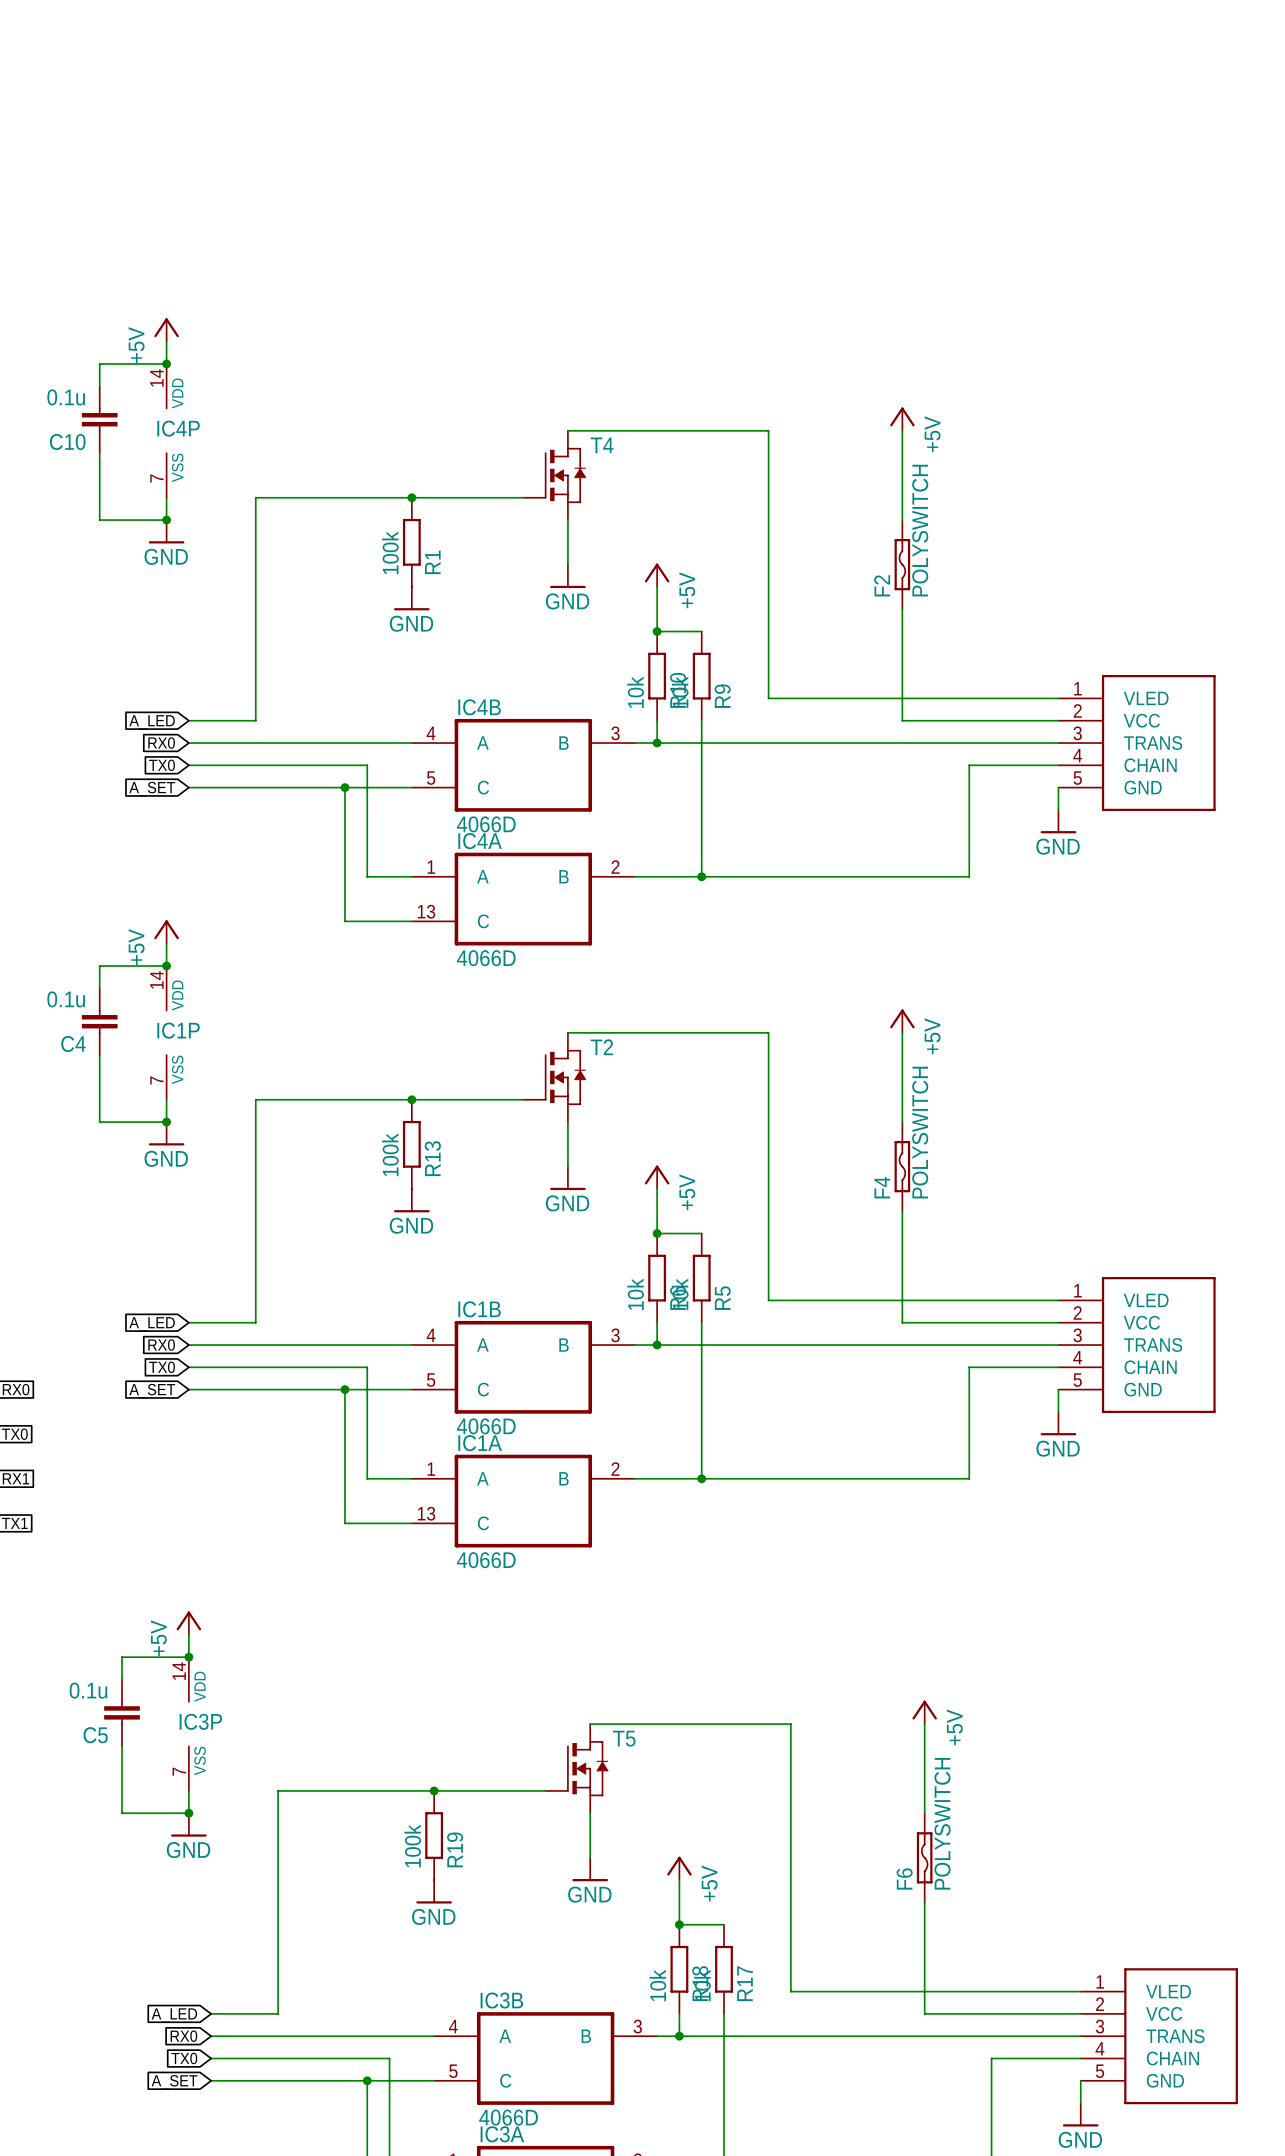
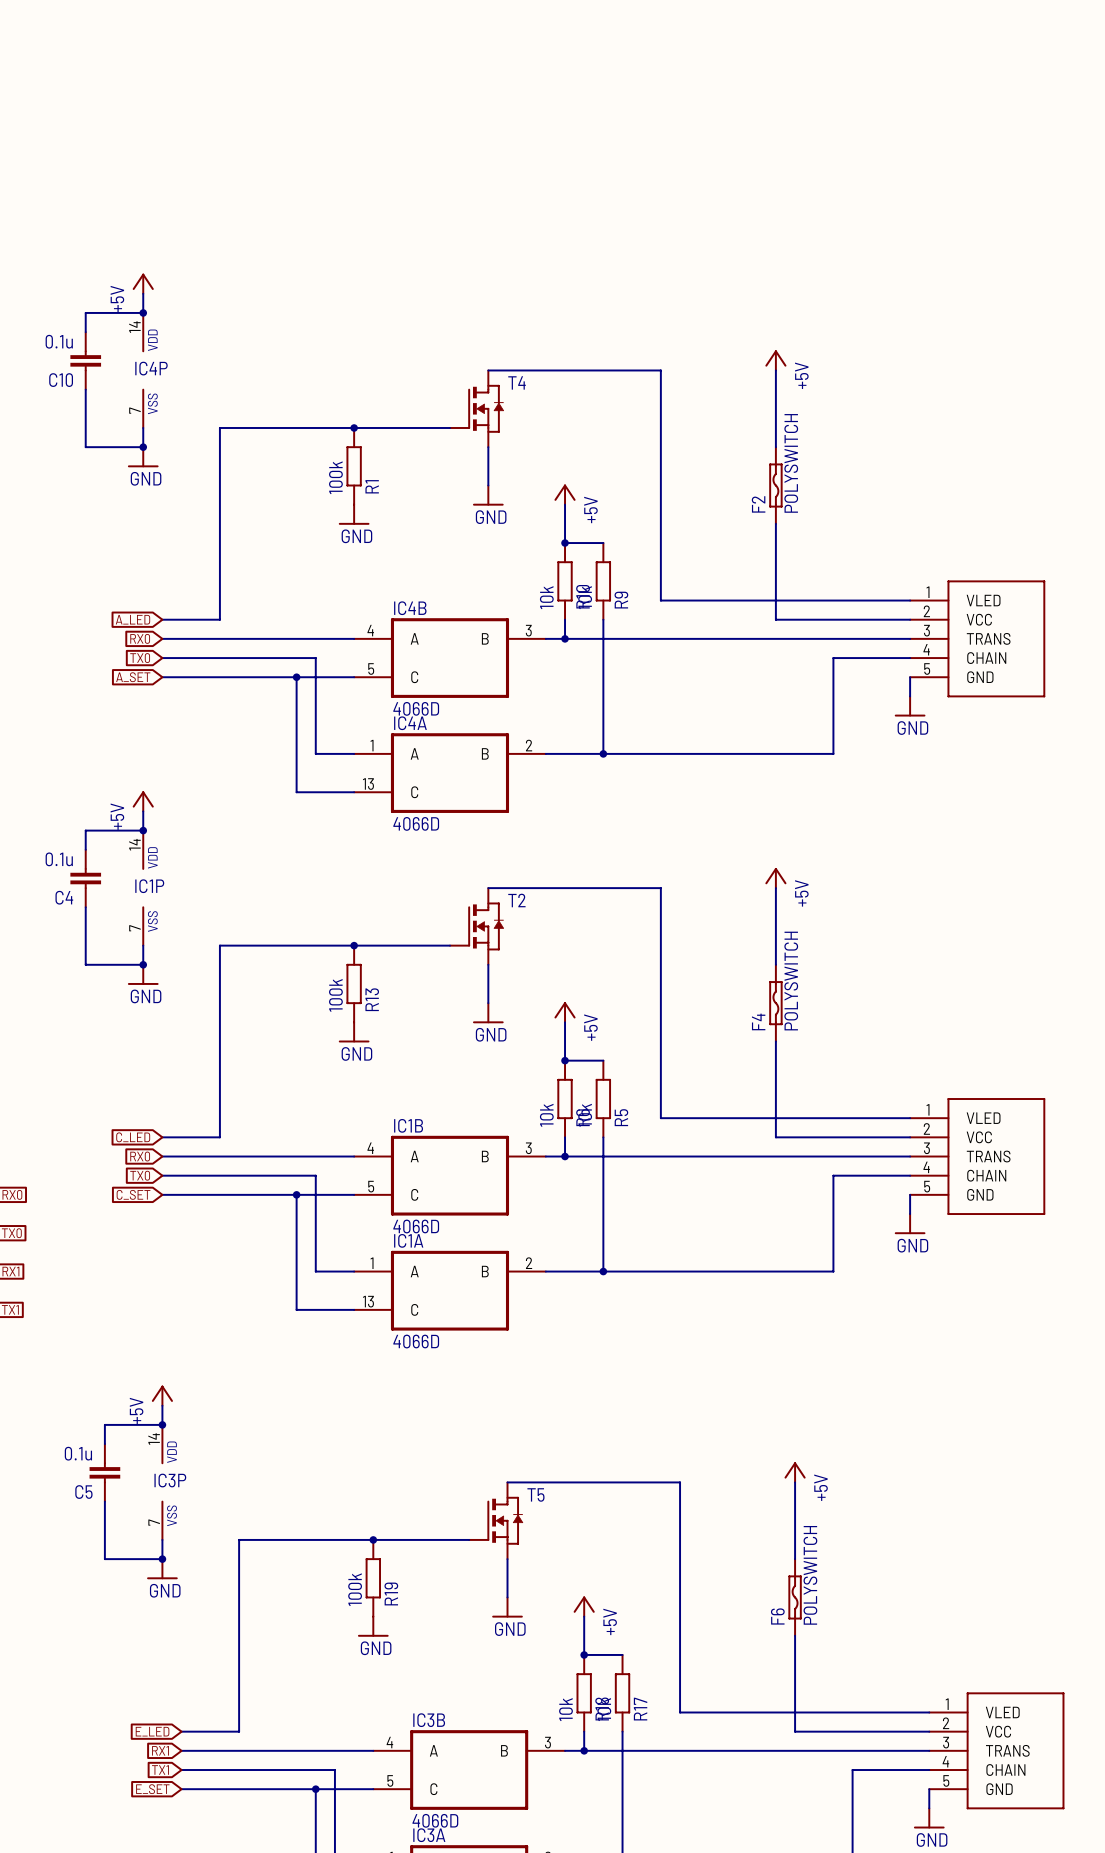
global label: A_LED (152, 1324) -> C_LED (133, 1137)
global label: A_SET (152, 1391) -> C_SET (133, 1194)
global label: A_LED (174, 2015) -> E_LED (152, 1731)
global label: RX0 (183, 2036) -> RX1 (160, 1750)
global label: TX0 (184, 2058) -> TX1 (160, 1770)
global label: A_SET (174, 2082) -> E_SET (152, 1789)

